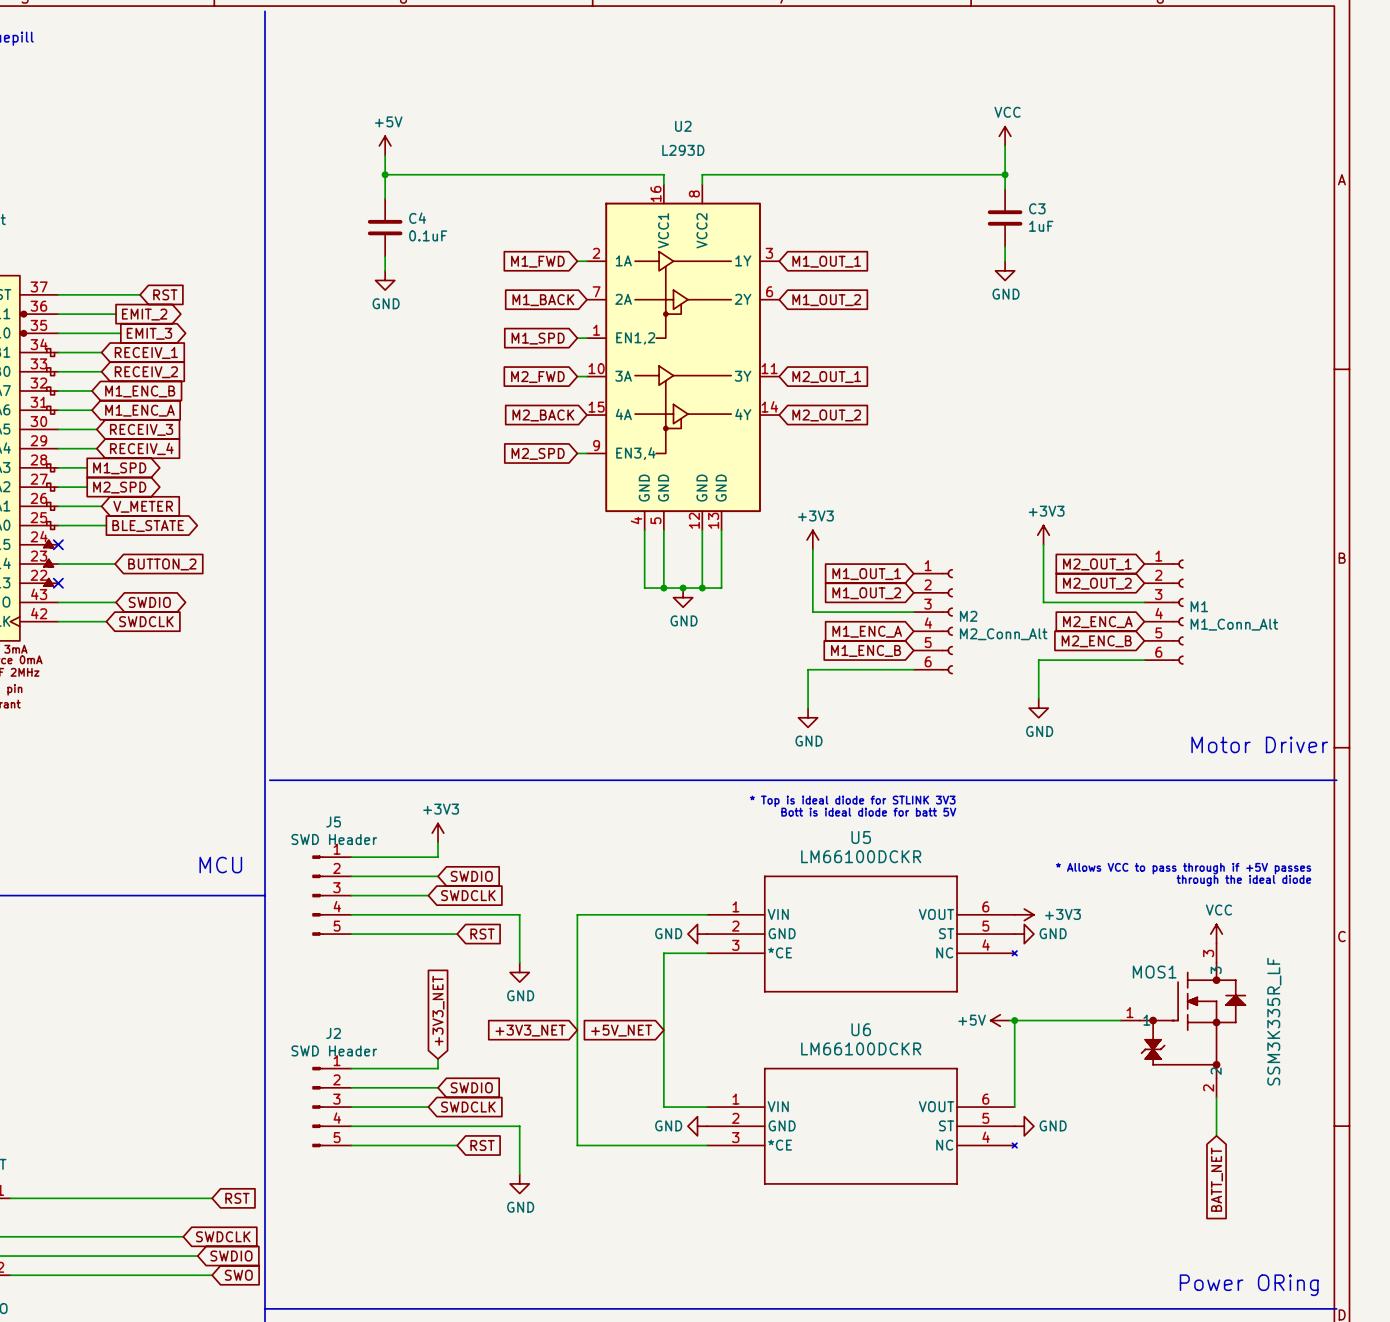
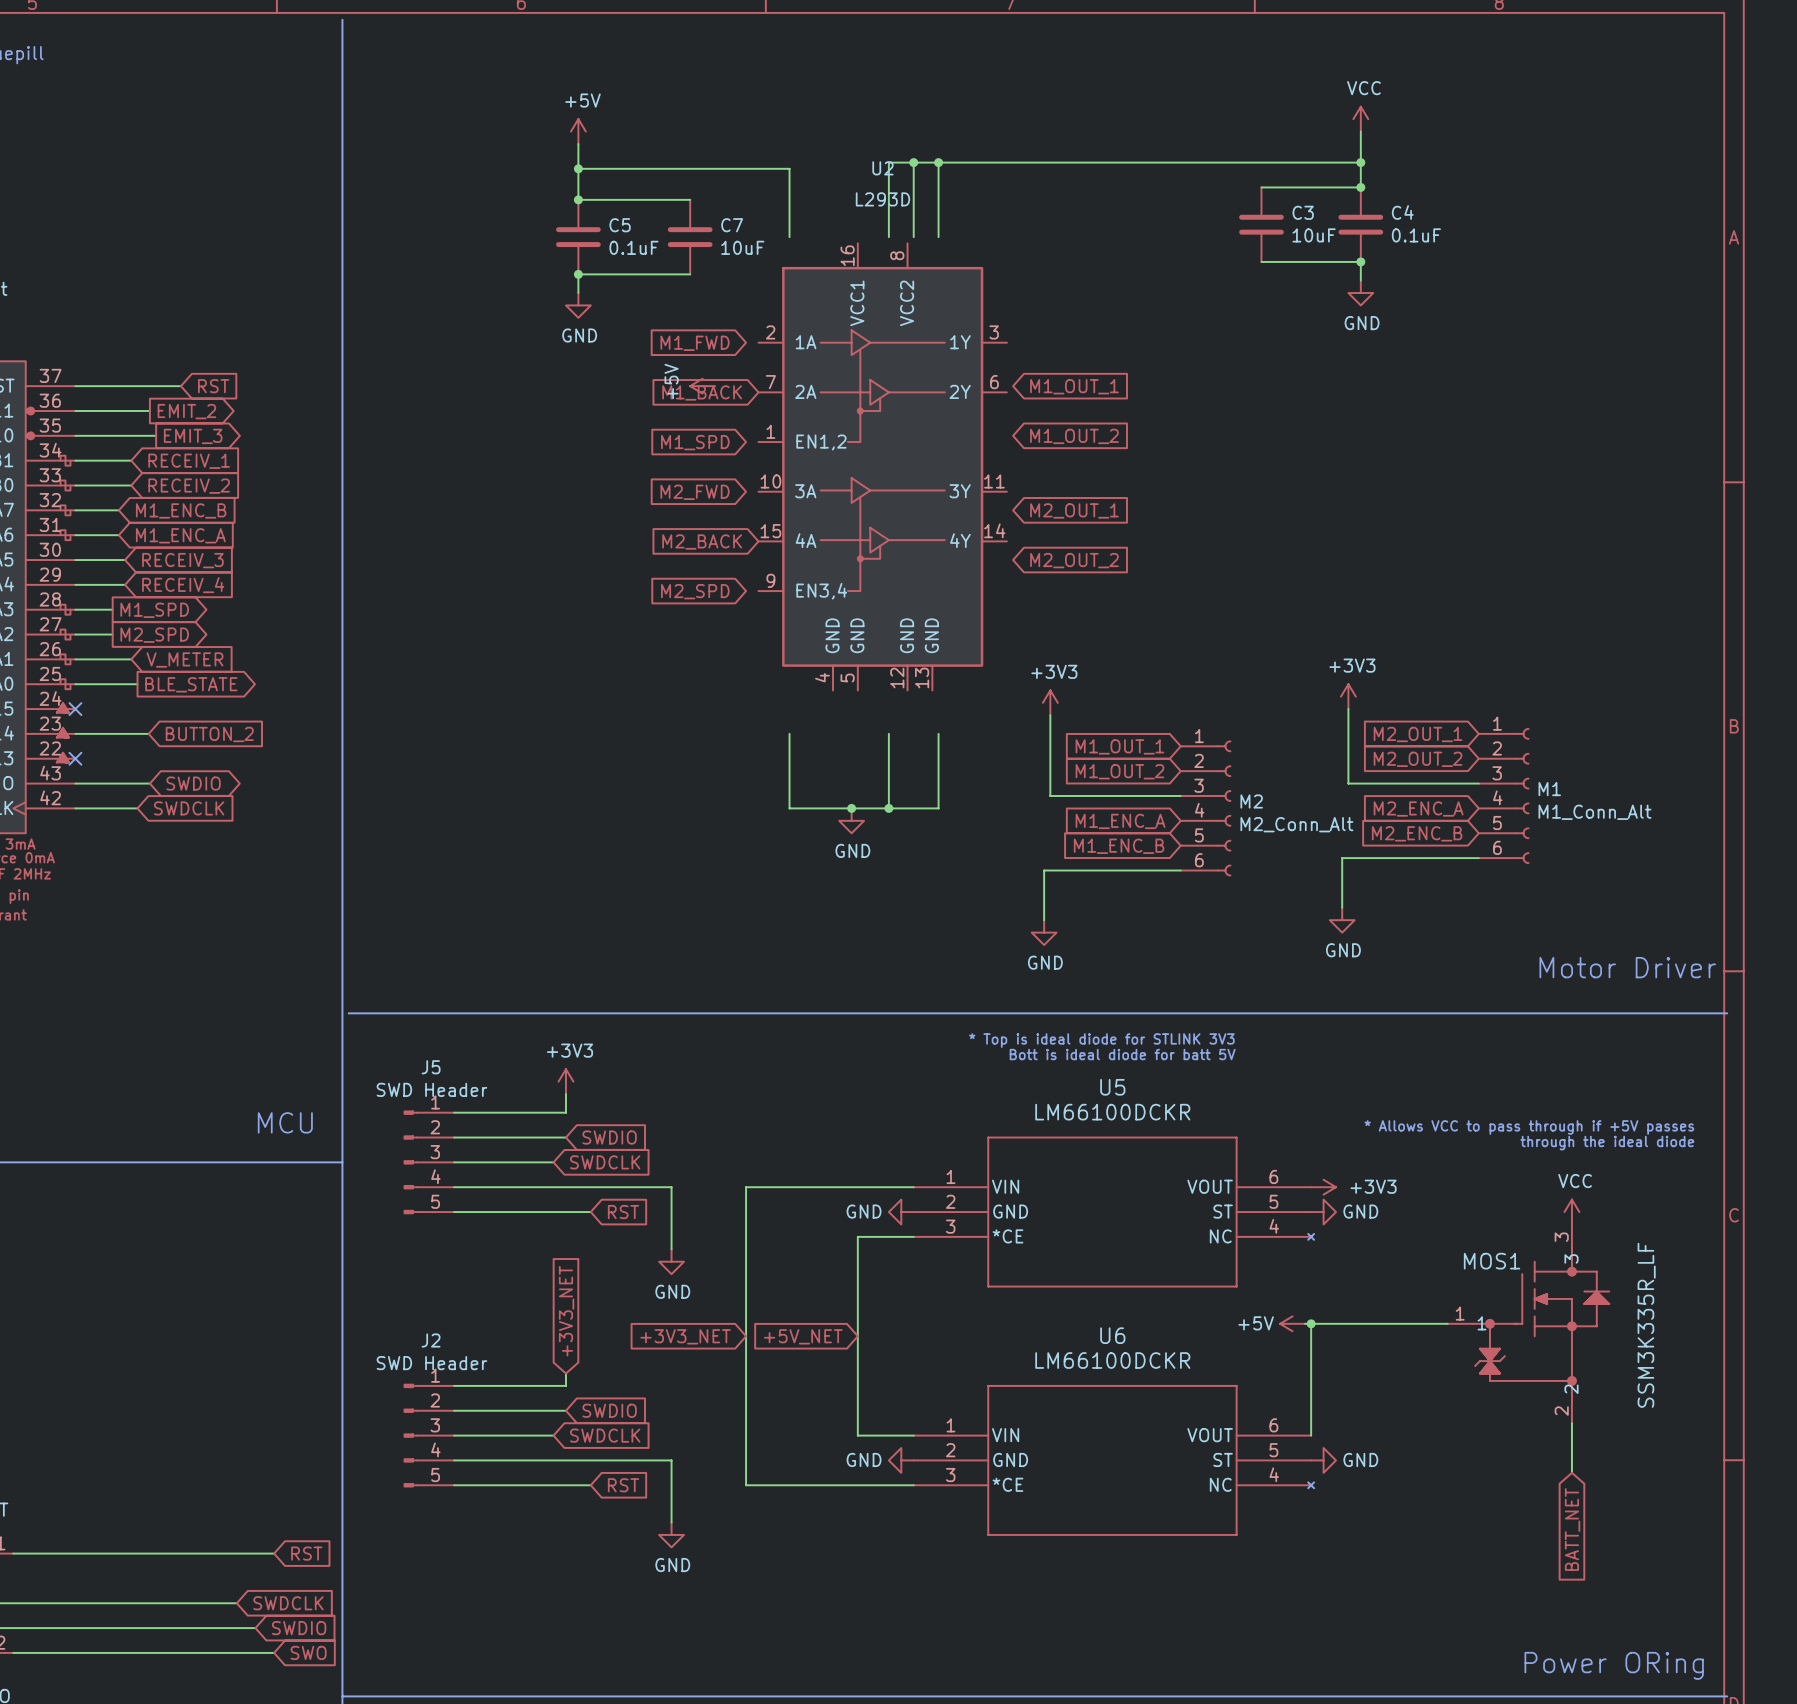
wire: none -> (1360, 131) (1360, 187) (1261, 187)
wire: none -> (578, 143) (578, 199) (690, 199)
wire: none -> (913, 162) (913, 237)
junction: none -> (913, 162)
wire: none -> (938, 162) (938, 237)
junction: none -> (938, 162)
wire: none -> (1360, 162) (888, 162) (888, 237)
junction: none -> (1360, 162)
wire: none -> (578, 168) (789, 168) (789, 237)
junction: none -> (578, 168)
power symbol position: VCC (1005, 136) -> VCC (1360, 119)
junction: none -> (1360, 187)
power symbol position: +5V (385, 145) -> +5V (578, 131)
wire: (1005, 145) (1005, 189) -> none
junction: none -> (578, 199)
wire: (385, 155) (385, 198) -> none
wire: (385, 174) (663, 174) (663, 184) -> none
junction: (385, 174) -> none
wire: (1005, 174) (702, 174) (702, 184) -> none
junction: (1005, 174) -> none
C5: none -> 0.1uF (578, 237)
C7: none -> 10uF (690, 237)
wire: none -> (1261, 261) (1360, 261) (1360, 280)
junction: none -> (1360, 261)
junction: none -> (578, 274)
wire: none -> (690, 274) (578, 274) (578, 293)
C3 position: (1005, 217) -> (1261, 224)
C3 value: 1uF (1041, 226) -> 10uF (1314, 235)
C4 position: (385, 227) -> (1360, 224)
wire: (1005, 246) (1005, 261) -> none
wire: (385, 256) (385, 270) -> none
wire: (577, 261) (586, 261) -> none
global label position: M1_OUT_1 (826, 261) -> M1_OUT_1 (1074, 386)
power symbol position: GND (1005, 270) -> GND (1360, 293)
power symbol position: GND (385, 280) -> GND (578, 305)
power symbol: none -> +5V (702, 386)
global label position: M1_OUT_2 (826, 300) -> M1_OUT_2 (1074, 436)
wire: (577, 338) (586, 338) -> none
wire: (577, 376) (586, 376) -> none
global label position: M2_OUT_1 (826, 377) -> M2_OUT_1 (1074, 510)
global label position: M2_OUT_2 (826, 415) -> M2_OUT_2 (1074, 560)
wire: (577, 453) (586, 453) -> none
wire: (644, 530) (644, 588) (721, 588) (721, 530) -> none
wire: (663, 530) (663, 588) -> none
wire: (702, 530) (702, 588) -> (888, 733) (888, 808)
wire: none -> (789, 733) (789, 808) (938, 808) (938, 733)
junction: (663, 588) -> none
junction: (683, 588) -> none
junction: (702, 588) -> none
power symbol position: GND (683, 597) -> GND (851, 820)
junction: none -> (851, 808)
junction: none -> (888, 808)

